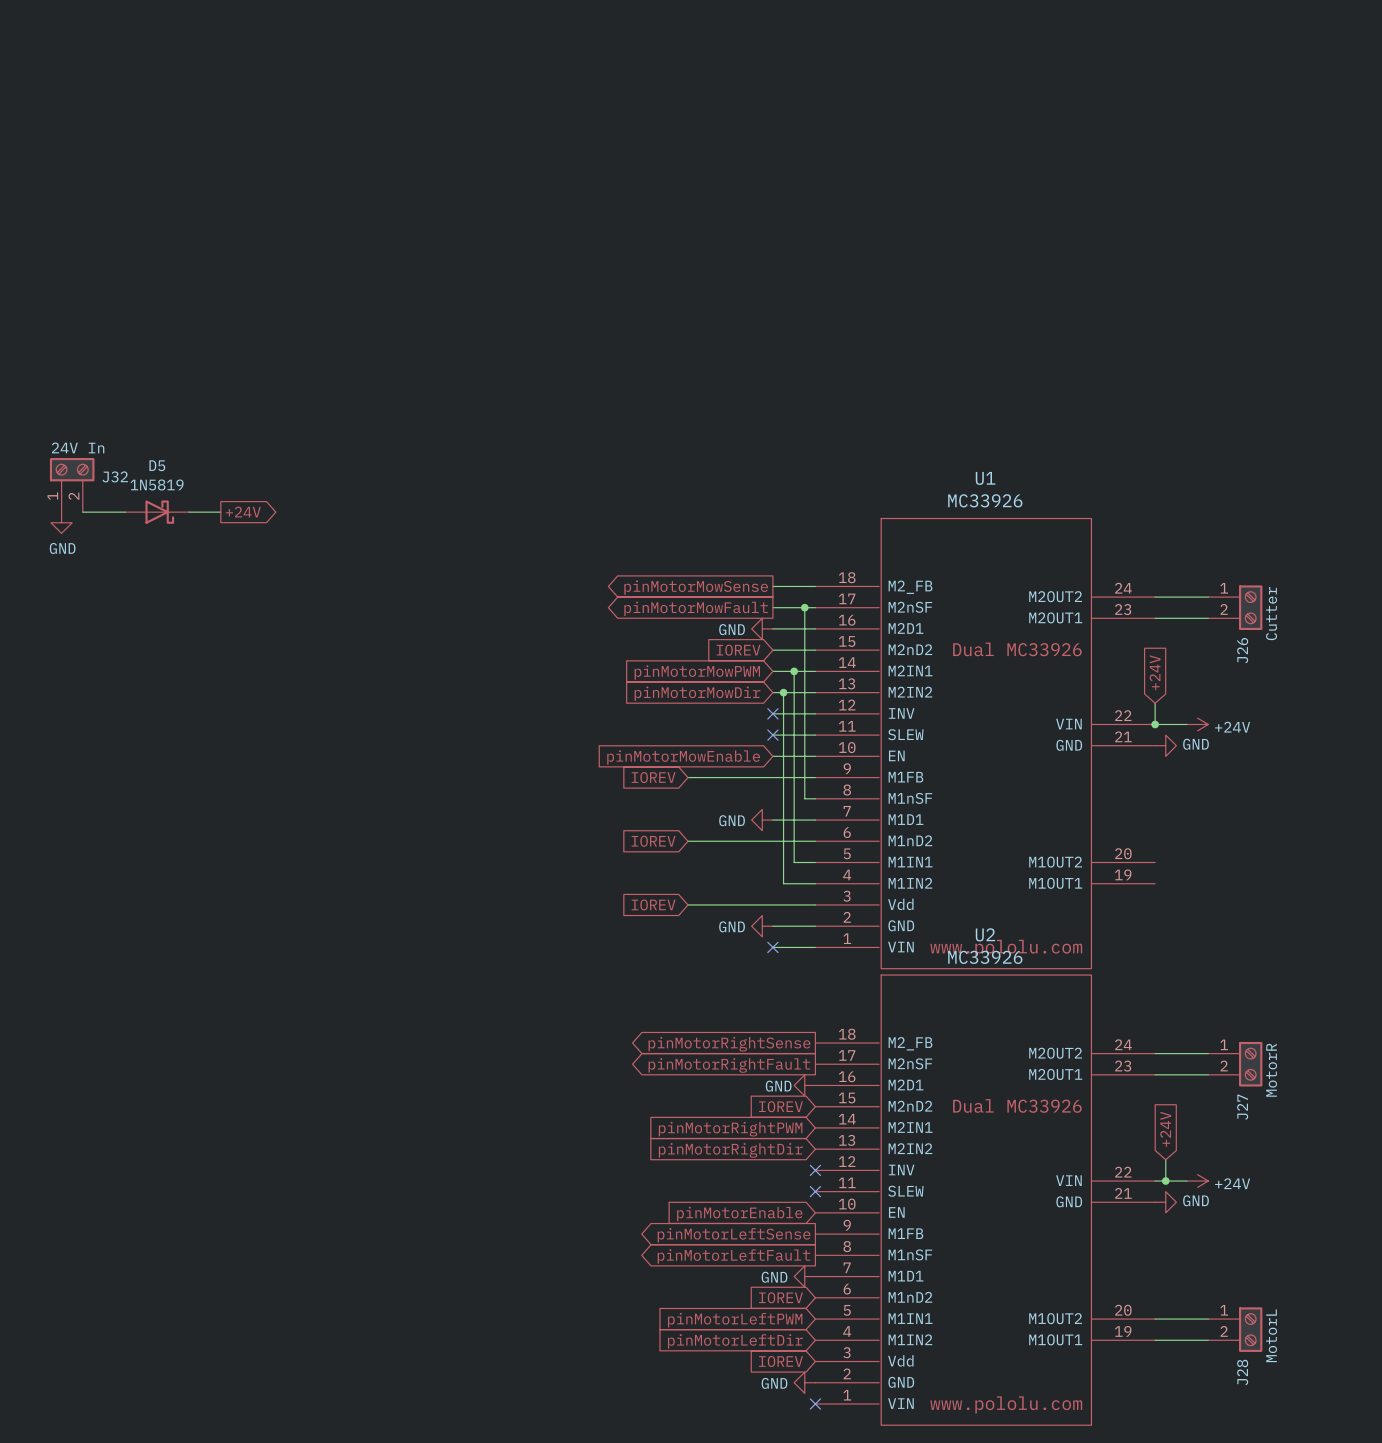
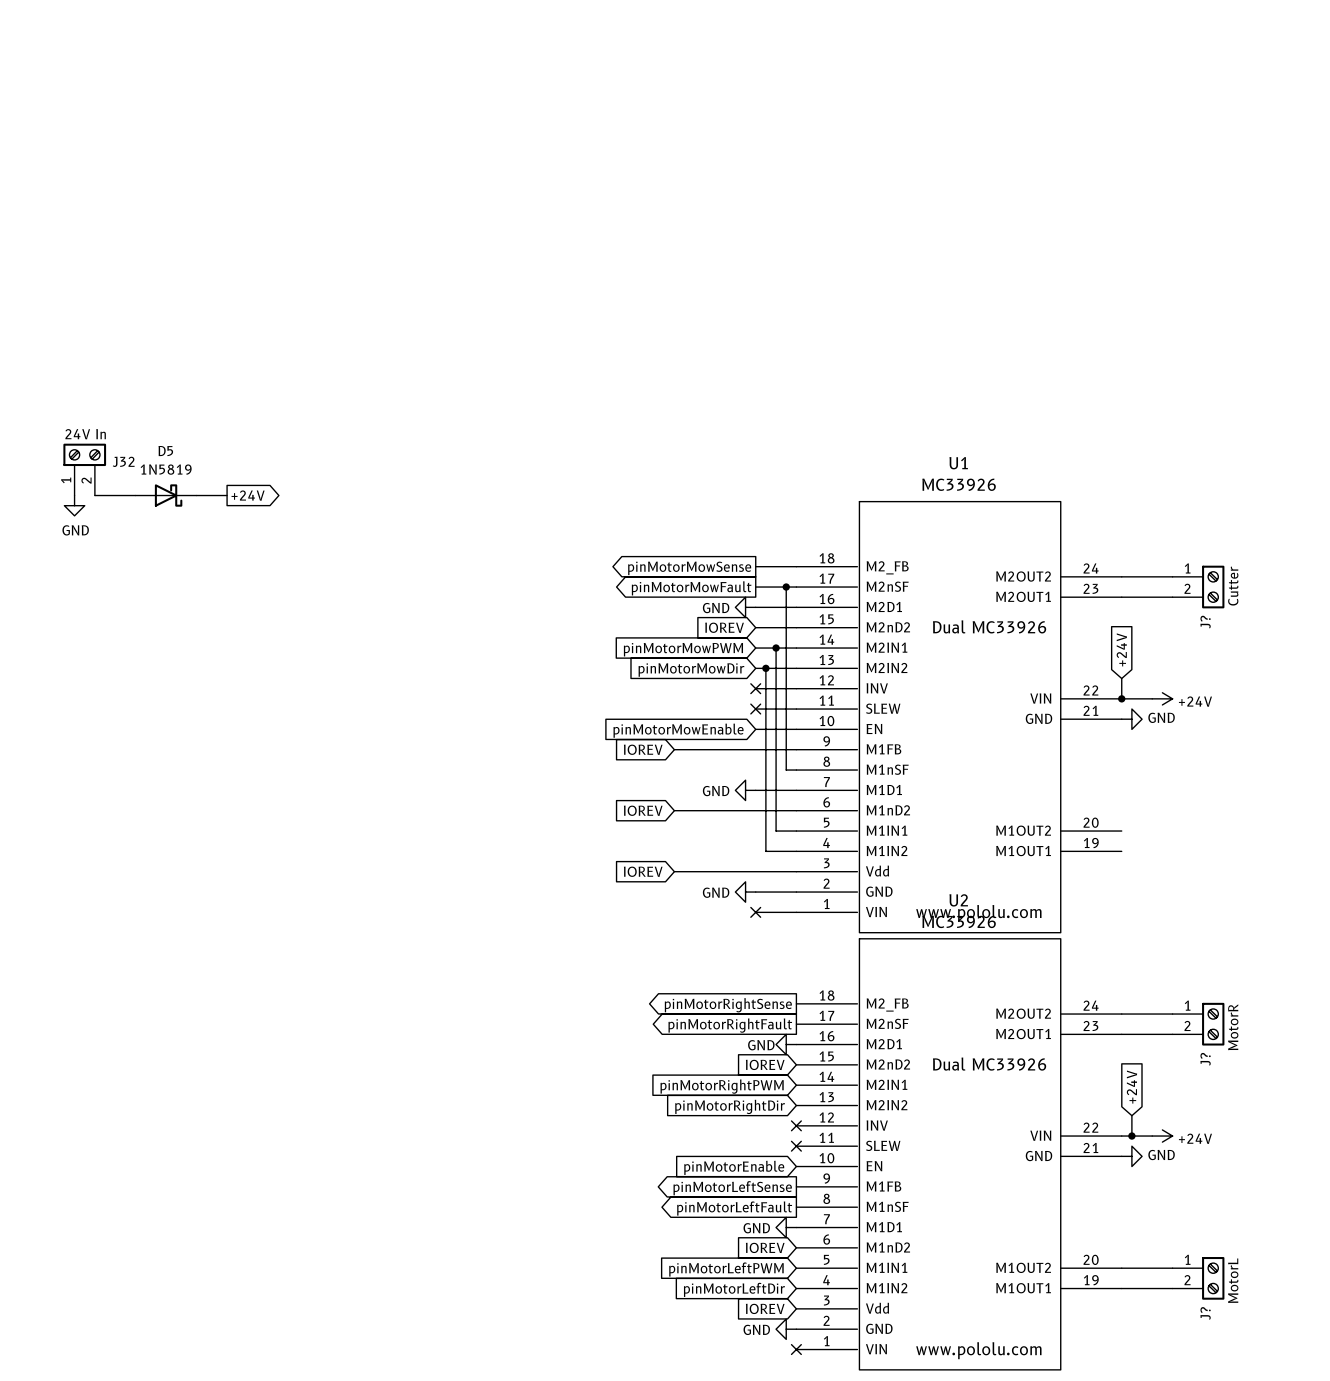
J26 name: J26 (1242, 650) -> J? (1205, 622)
J27 name: J27 (1242, 1107) -> J? (1205, 1059)
J28 name: J28 (1242, 1372) -> J? (1205, 1313)

